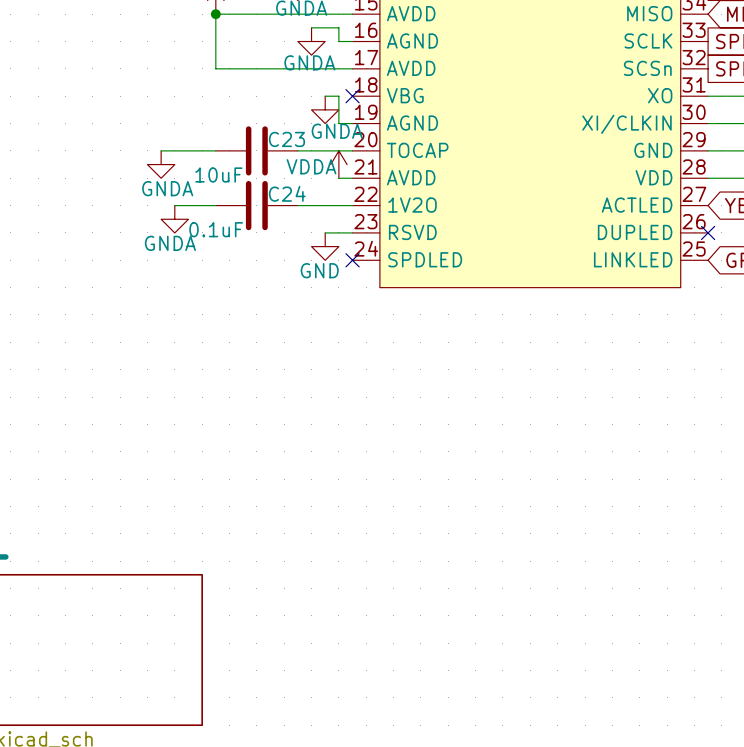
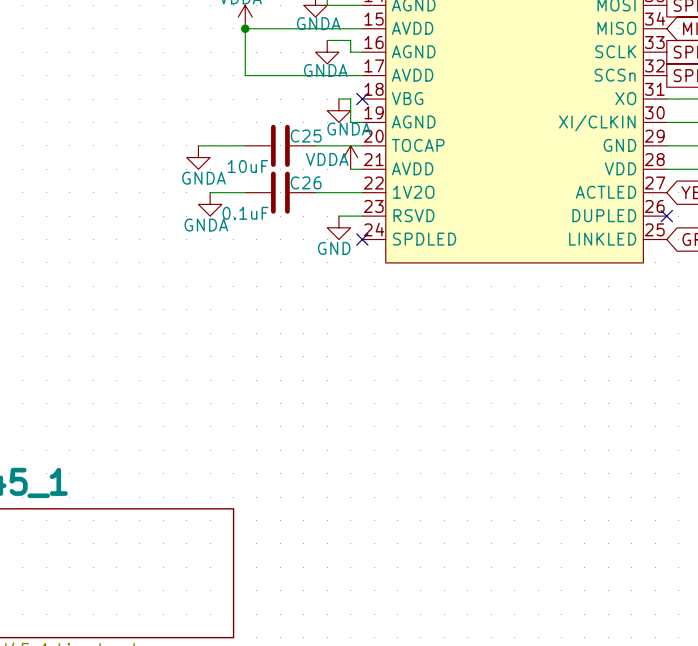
C23 name: C23 (286, 139) -> C25 (306, 136)
C24 name: C24 (287, 193) -> C26 (306, 182)

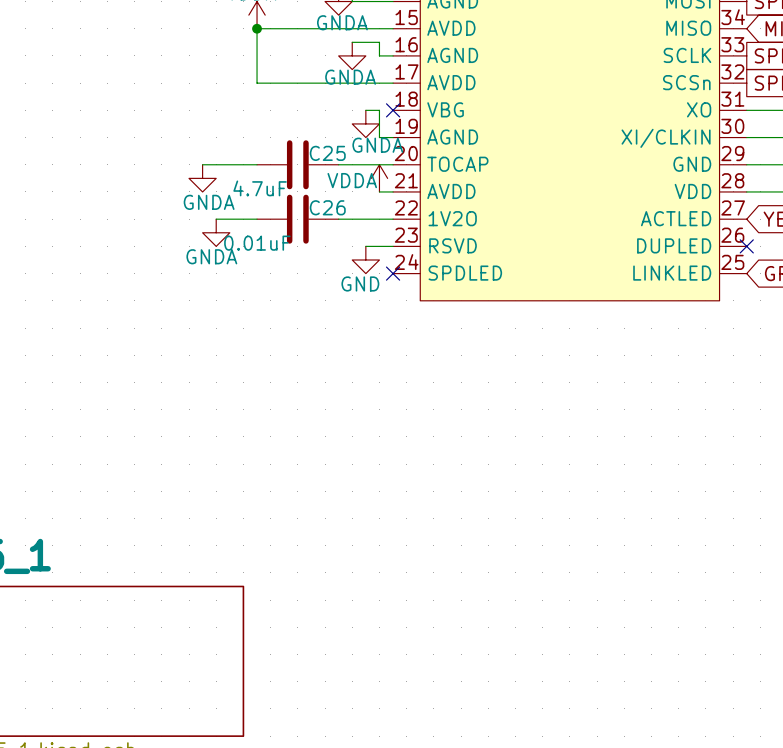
C25 value: 10uF (247, 166) -> 4.7uF (260, 188)
C26 value: 0.1uF (245, 213) -> 0.01uF (257, 243)

